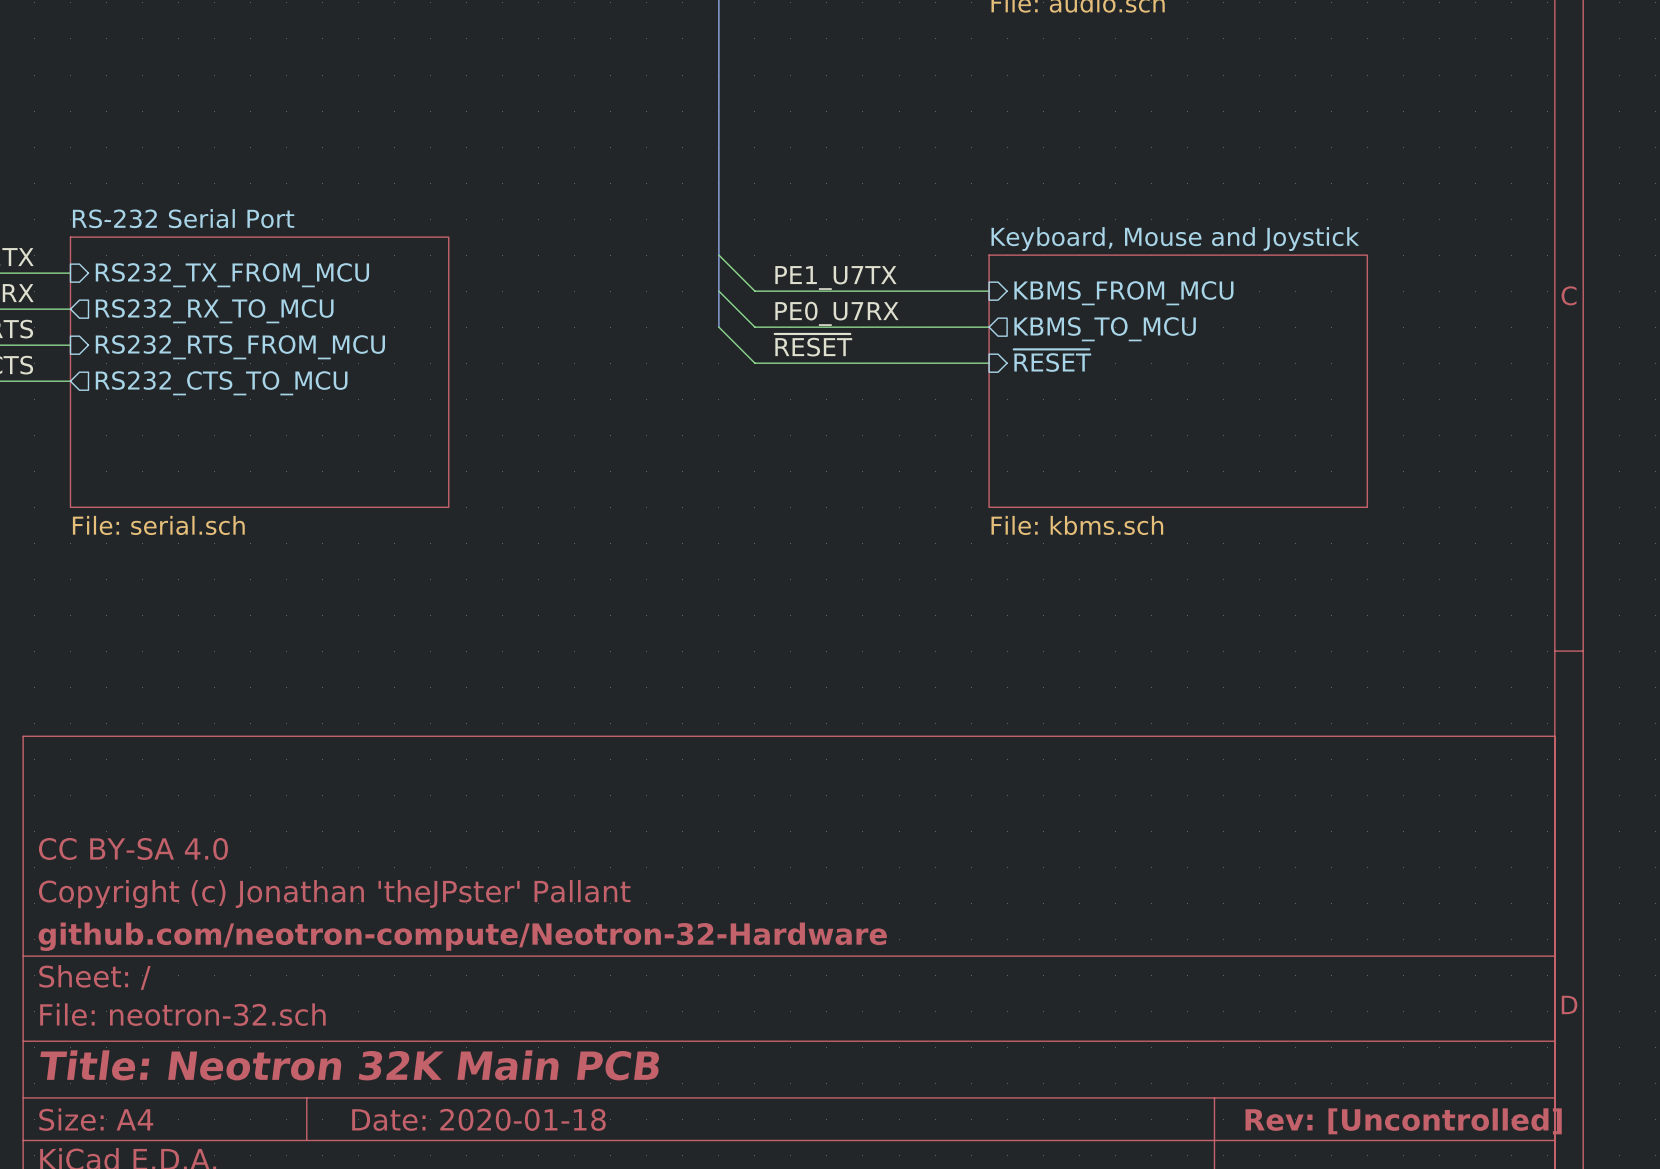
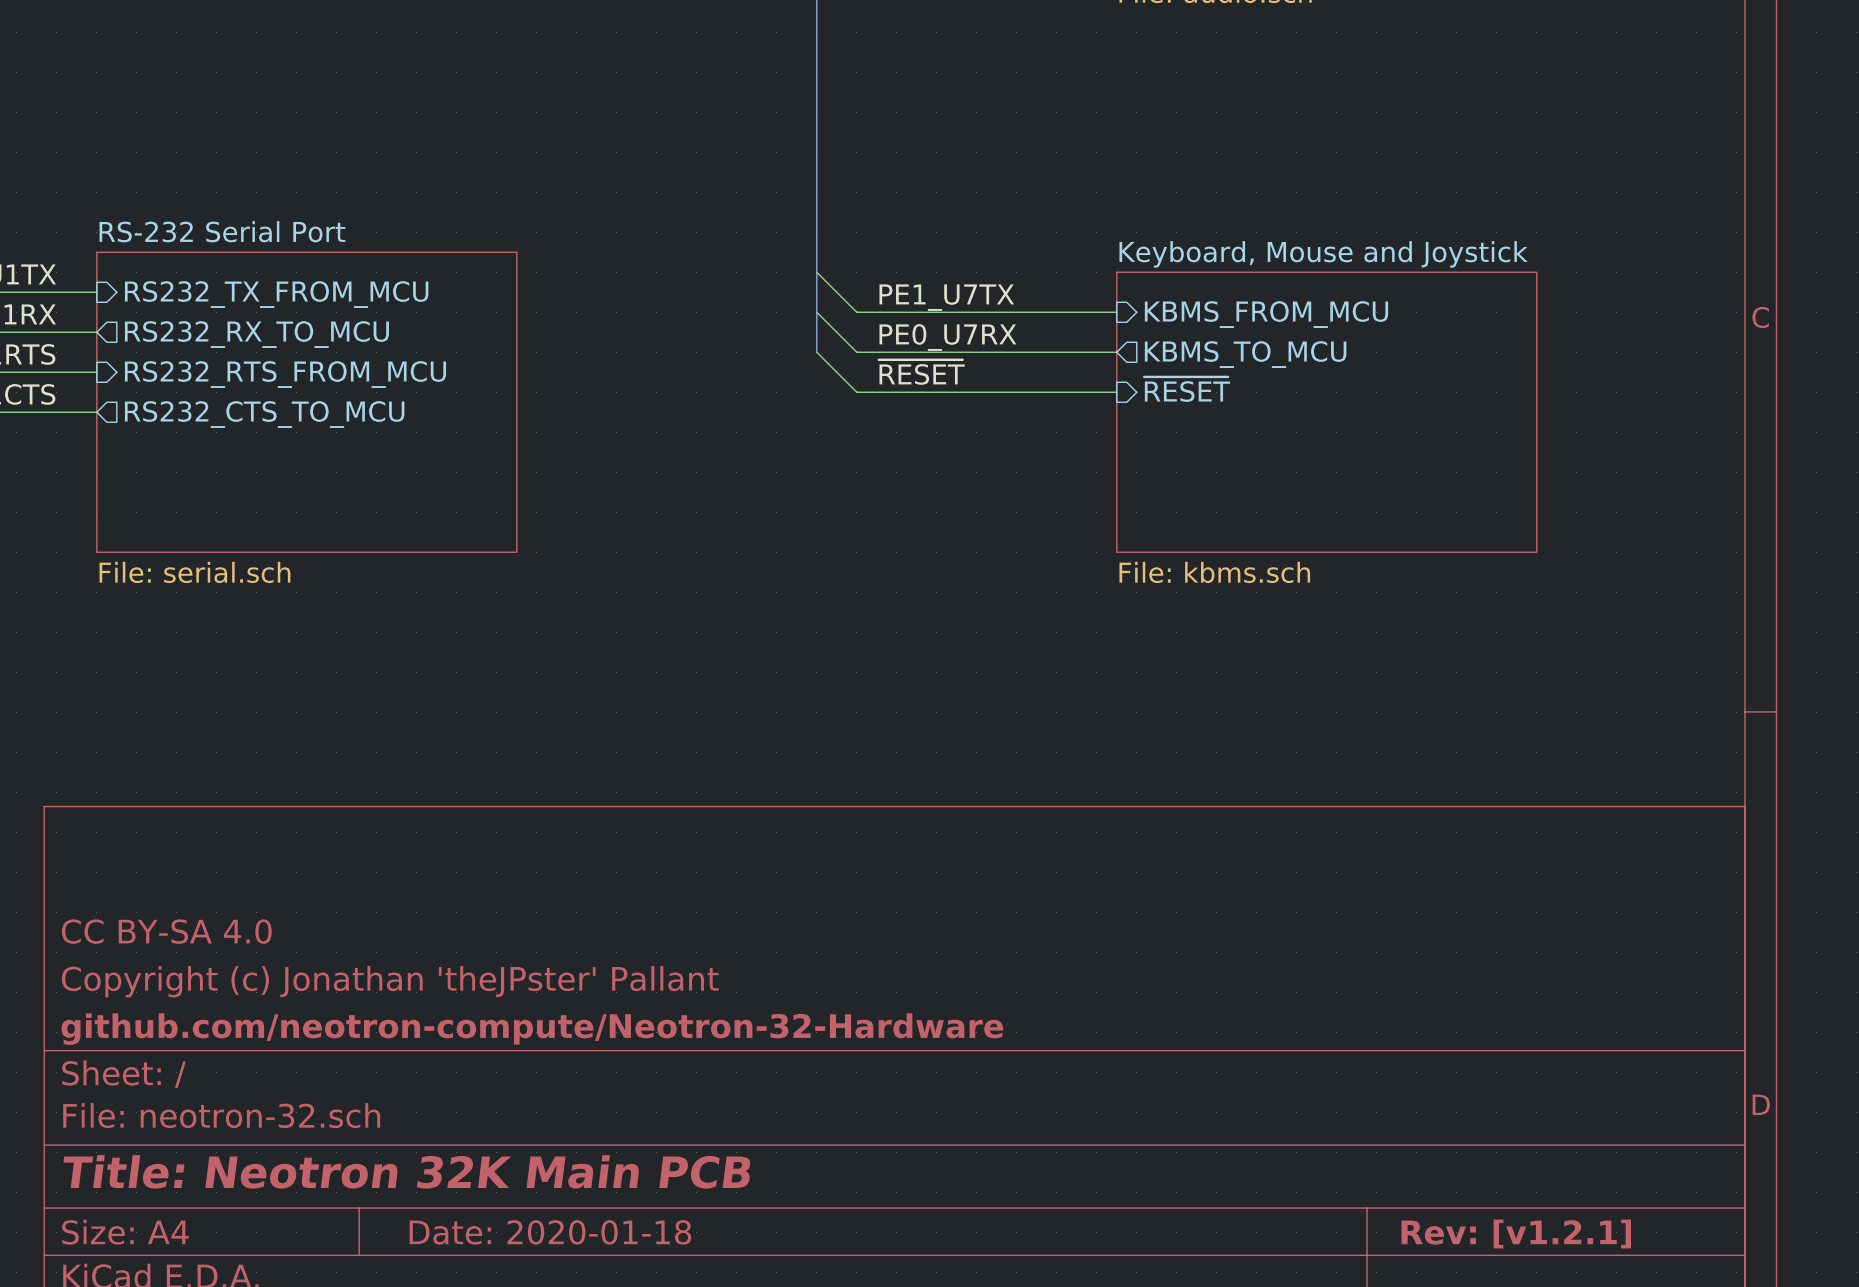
title block: Rev: [Uncontrolled] (1403, 1121) -> Rev: [v1.2.1] (1516, 1234)

